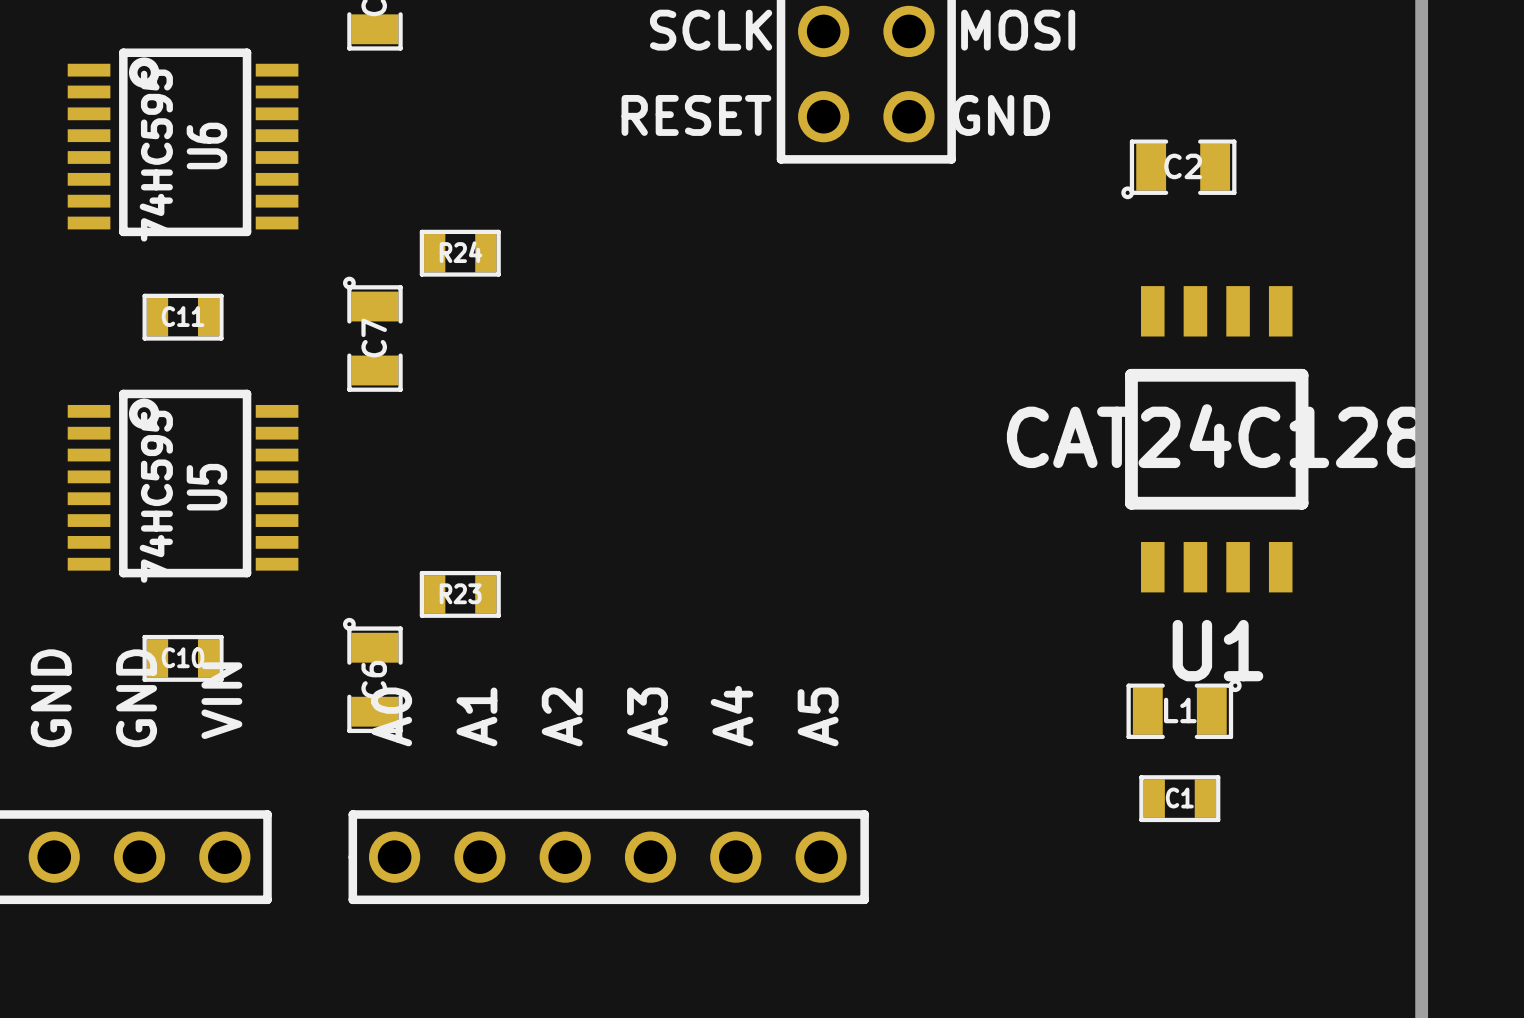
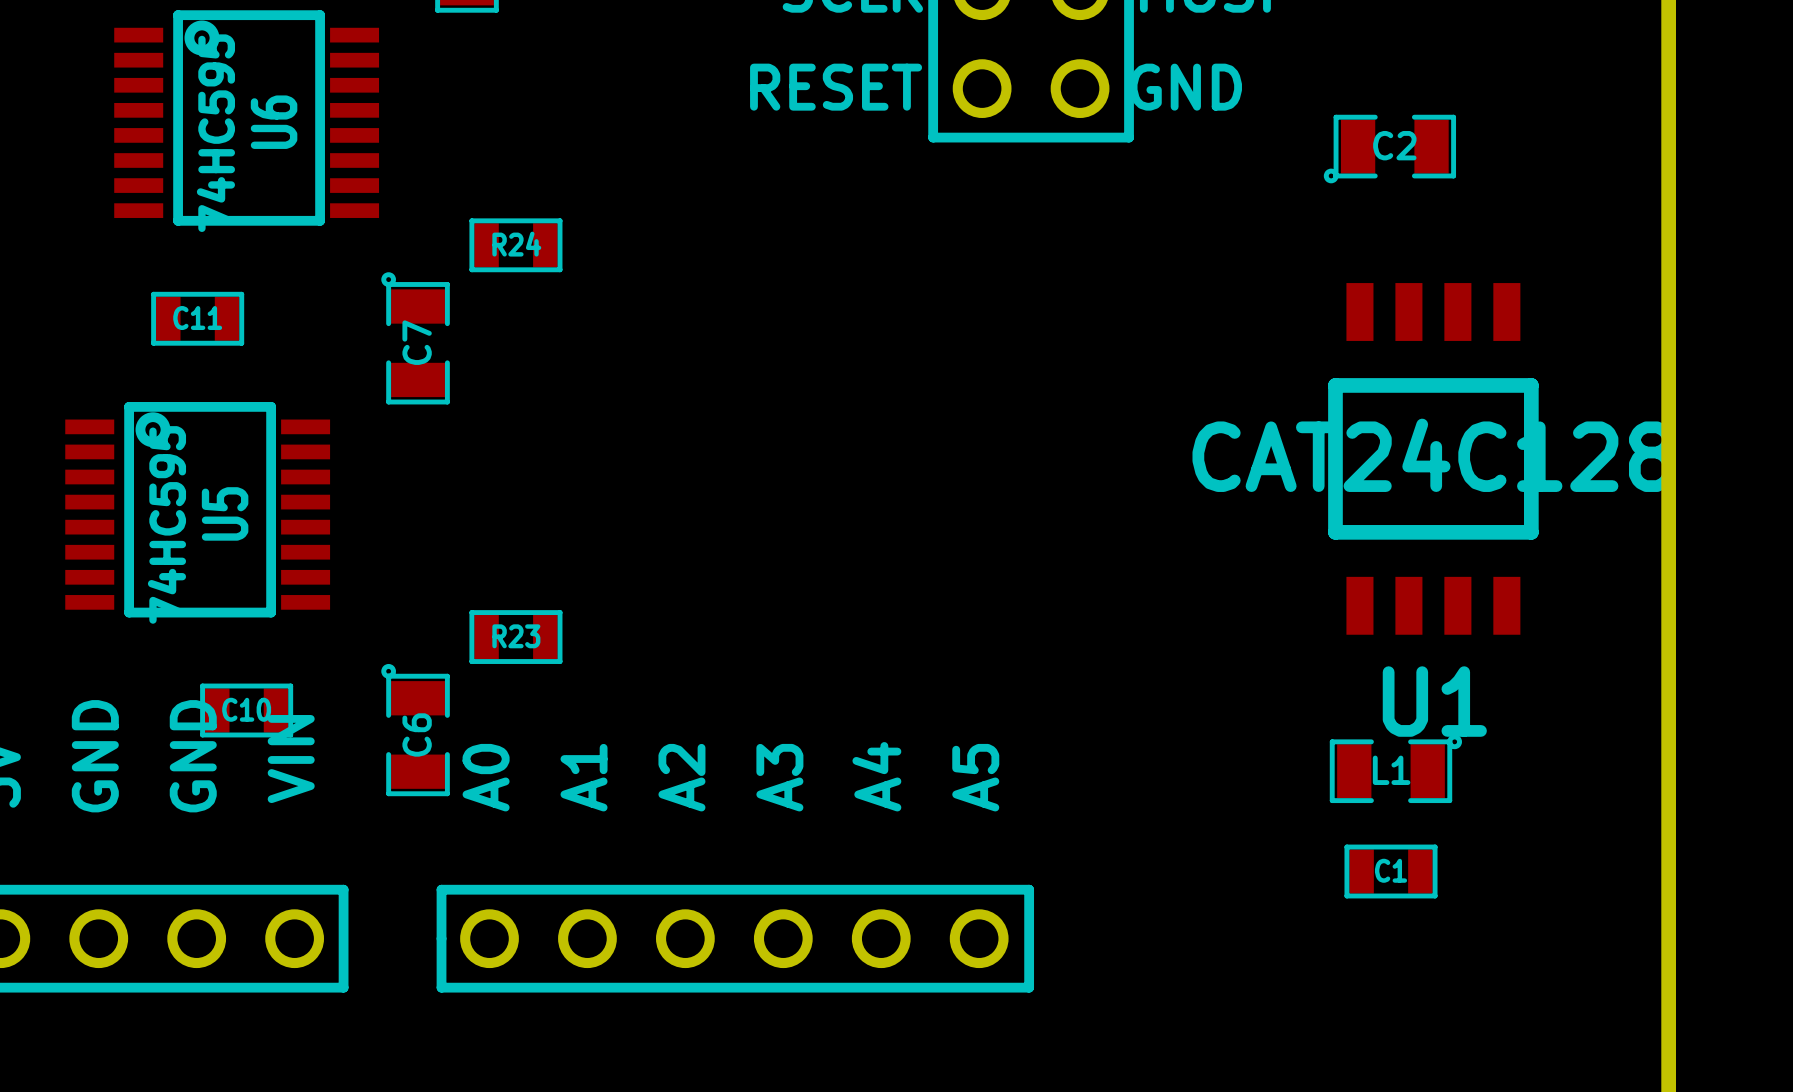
R24 position: (460, 253) -> (515, 245)
C11 position: (183, 317) -> (197, 318)
C7 position: (372, 334) -> (415, 338)
U5 position: (183, 483) -> (197, 509)
R23 position: (460, 594) -> (515, 637)
C6 position: (372, 675) -> (415, 730)

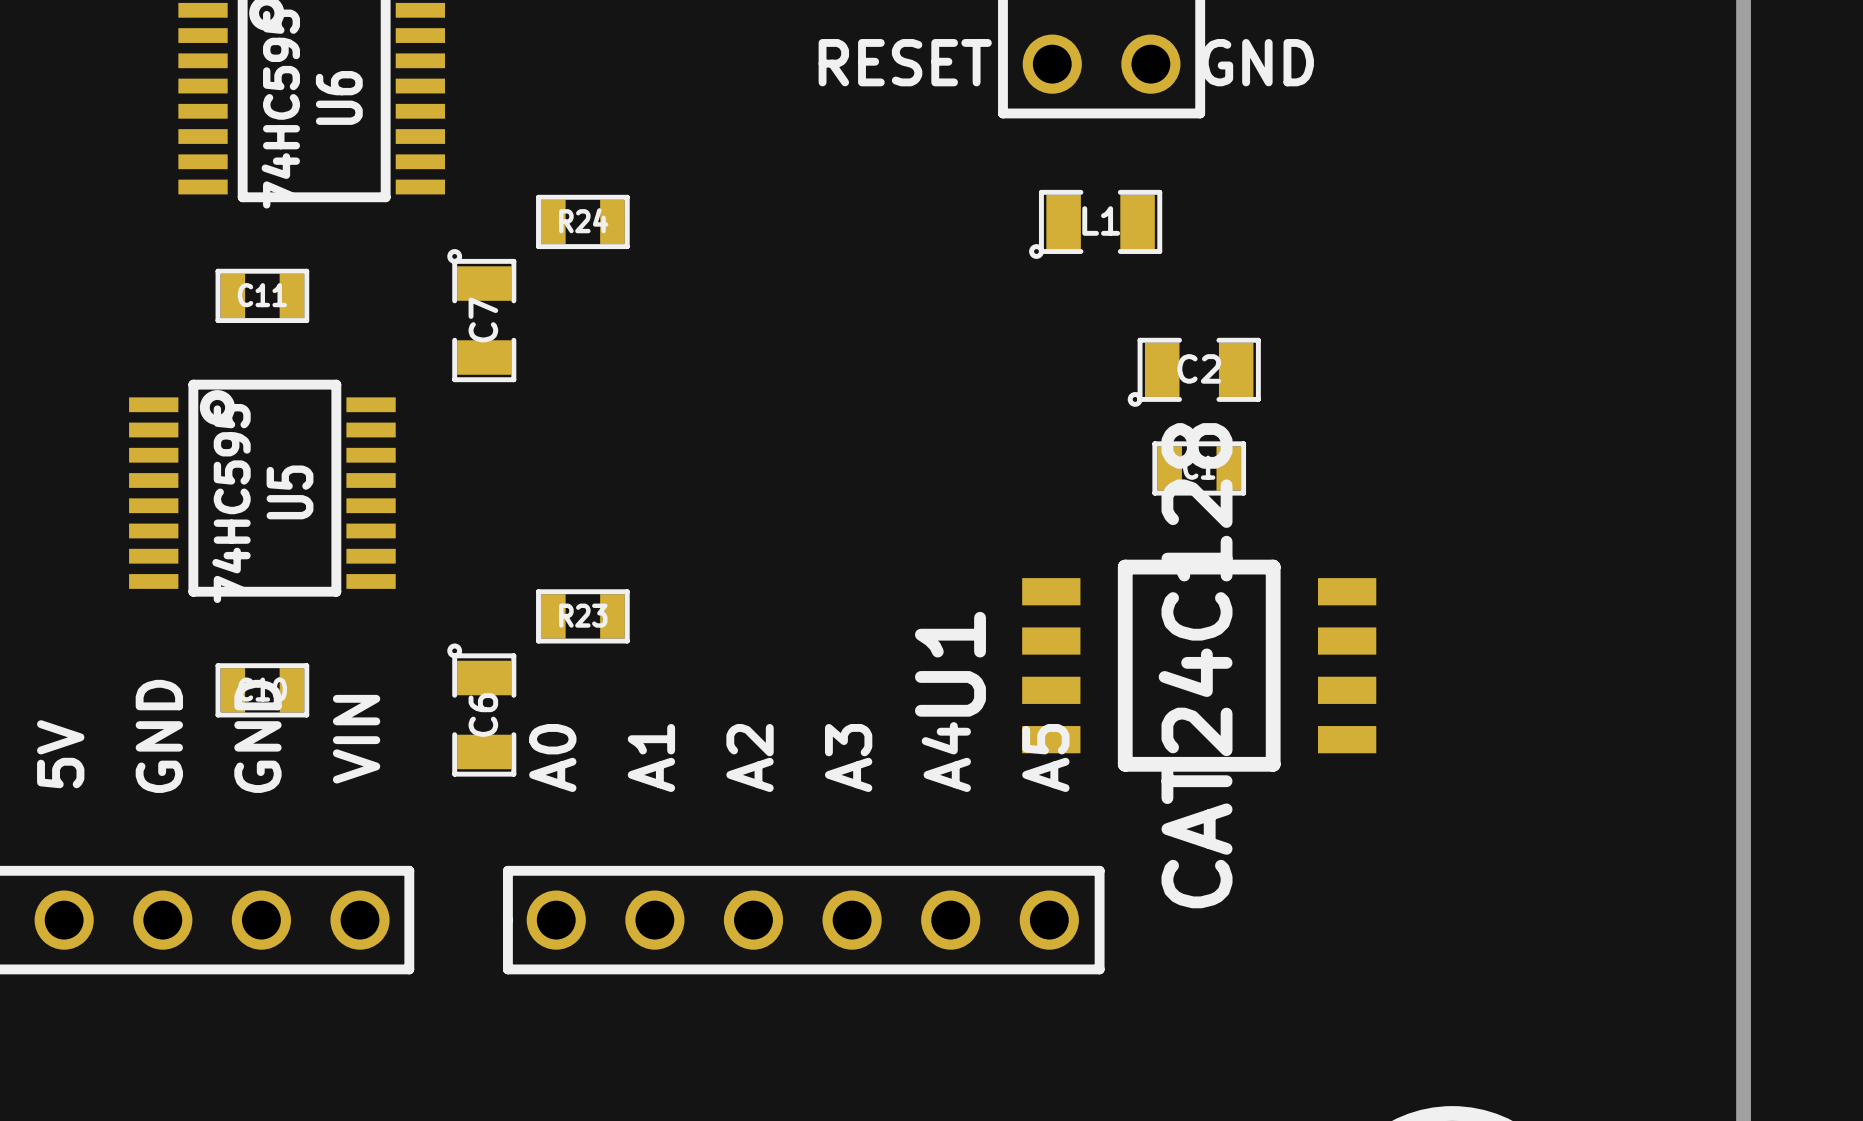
C2 position: (1389, 149) -> (1194, 372)
U1 rotation: 0° (1433, 458) -> 90° clockwise (1199, 665)
U1 position: (1433, 458) -> (1199, 665)
C10 position: (246, 710) -> (262, 690)
L1 rotation: 0° (1395, 768) -> 180° (1095, 224)
L1 position: (1395, 768) -> (1095, 224)
C1 position: (1391, 871) -> (1199, 468)

